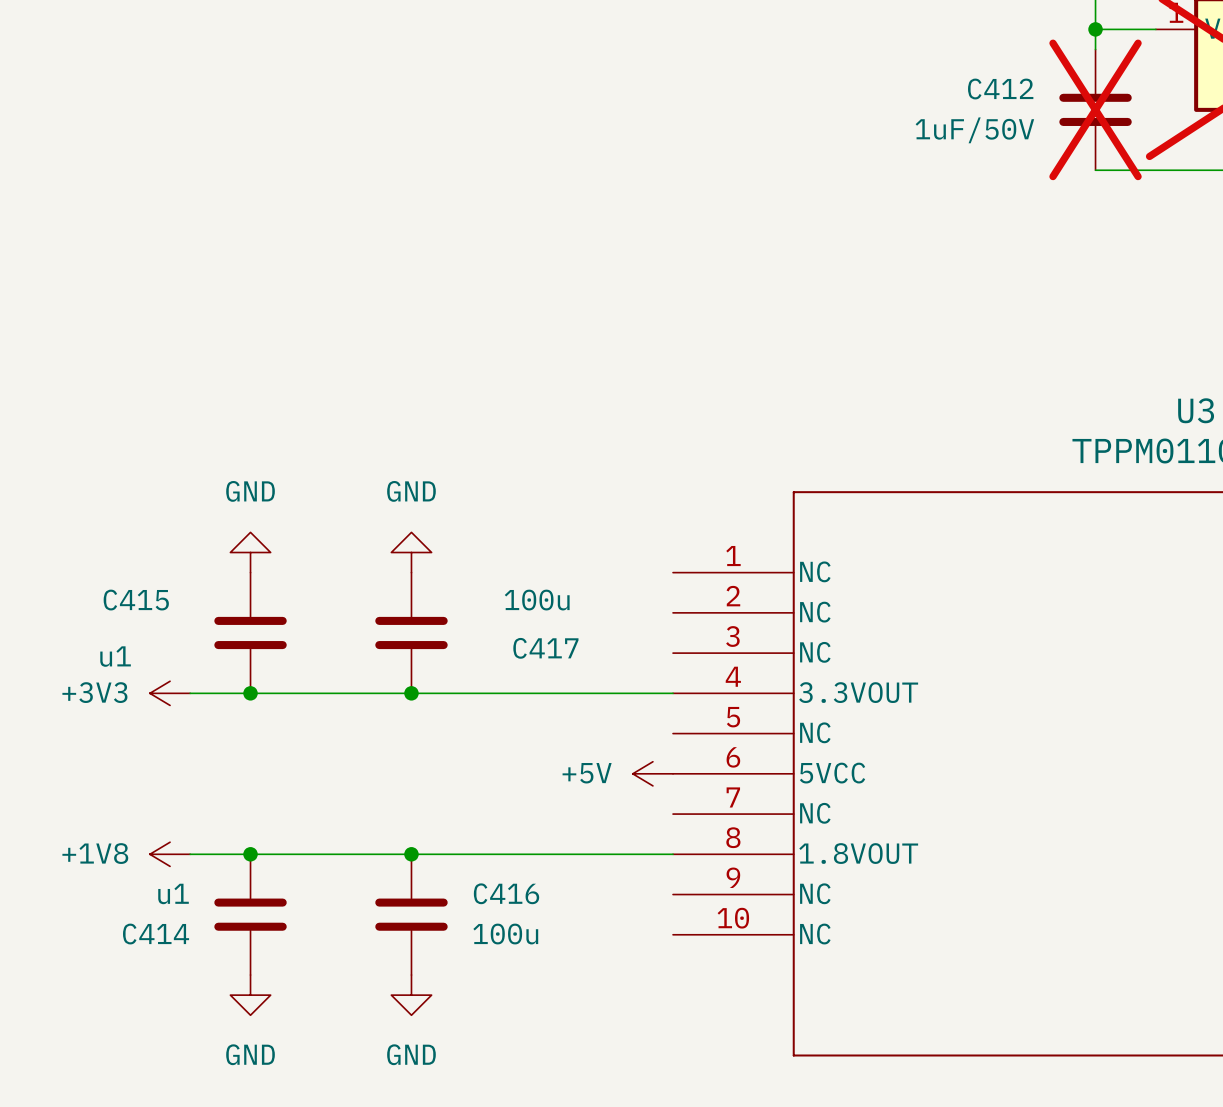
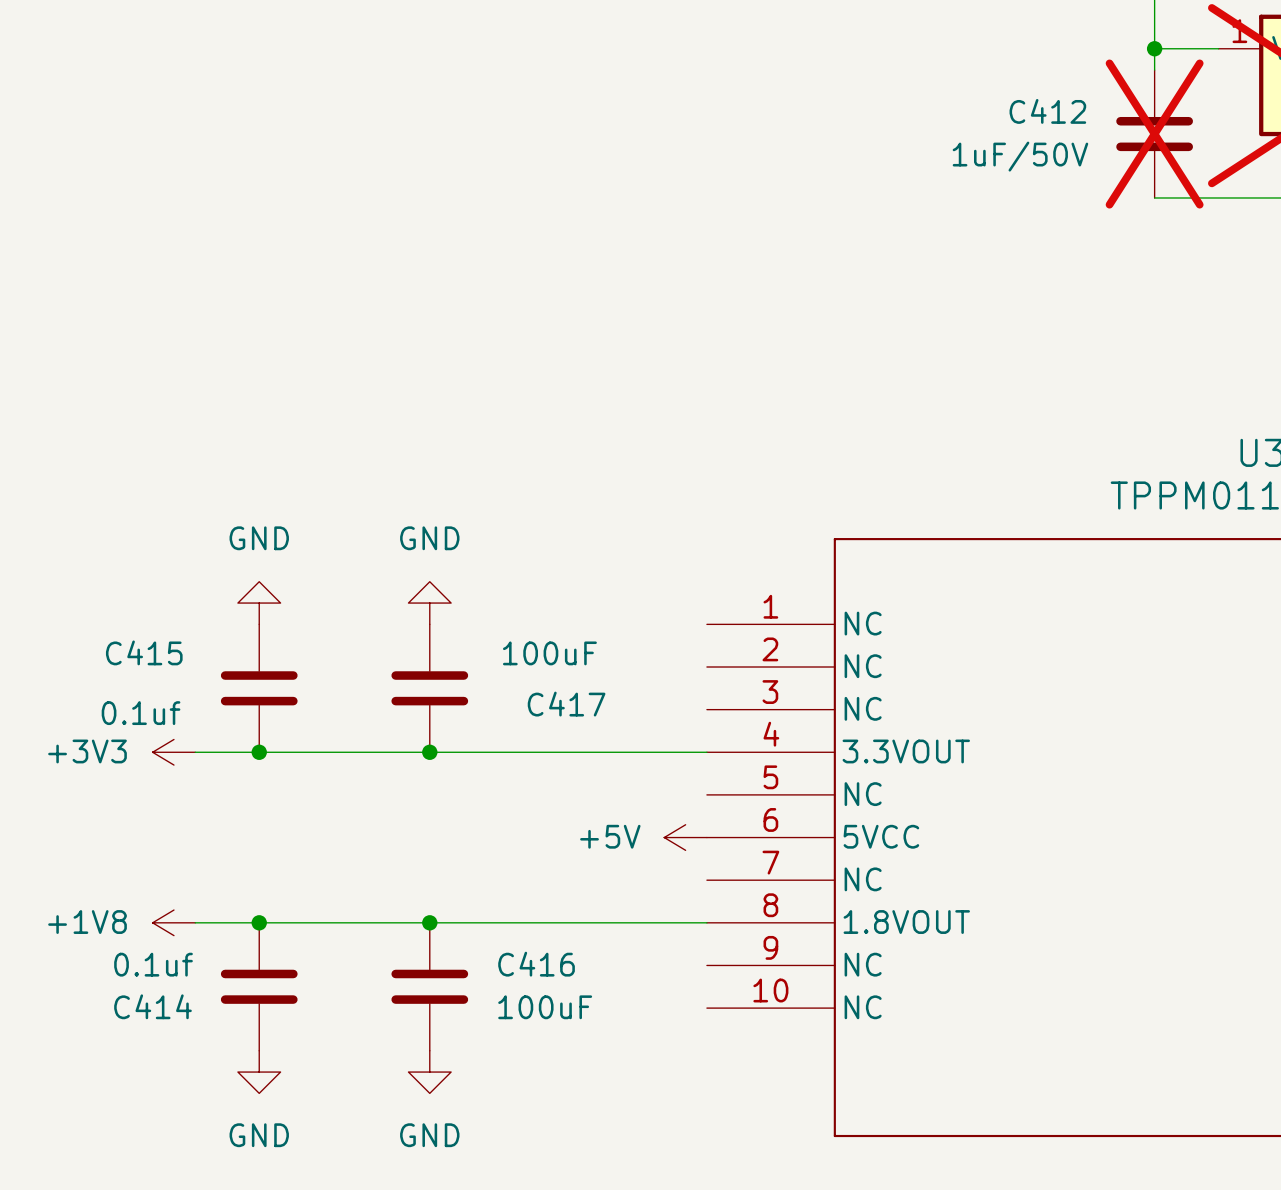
C417 value: 100u (537, 600) -> 100uF (549, 653)
C415 value: u1 (115, 656) -> 0.1uf (141, 713)
C414 value: u1 (173, 893) -> 0.1uf (153, 964)
C416 value: 100u (505, 934) -> 100uF (545, 1007)

